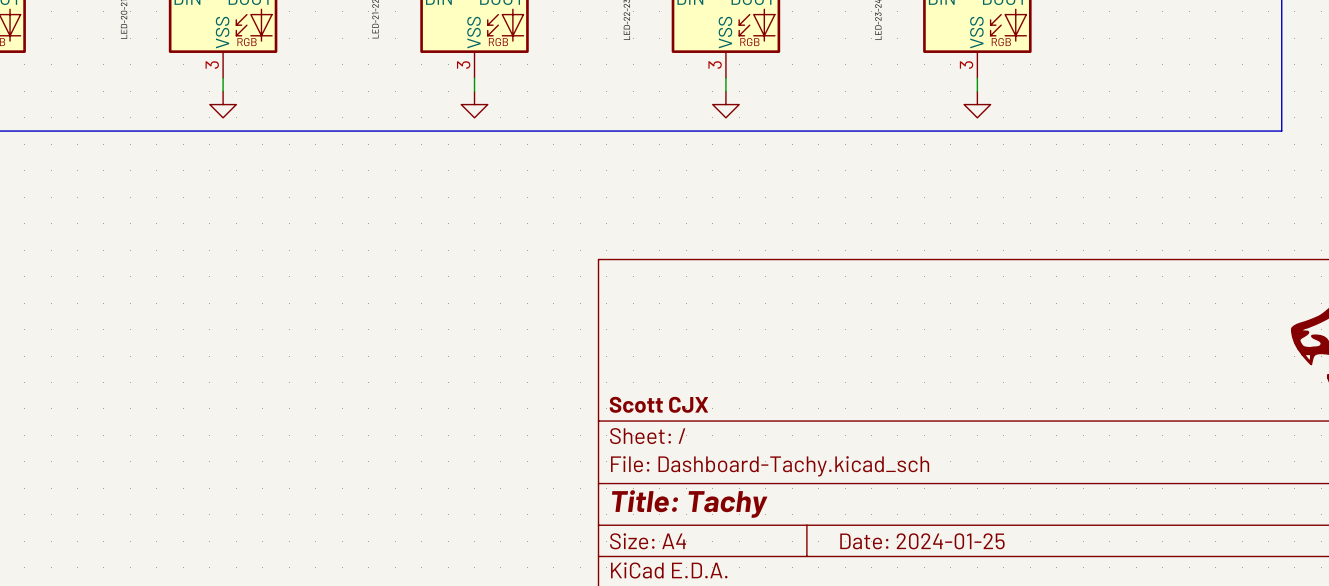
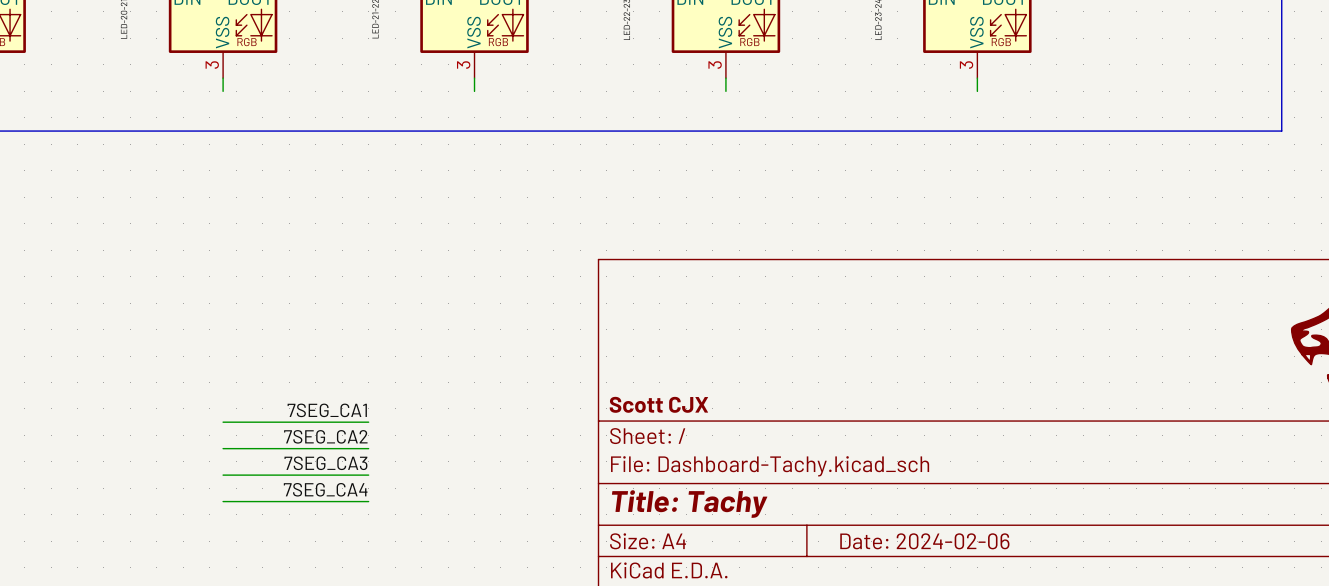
power symbol: (223, 104) -> none
power symbol: (474, 104) -> none
power symbol: (725, 104) -> none
power symbol: (977, 104) -> none
label: none -> 7SEG_CA1 (327, 410)
wire: none -> (223, 422) (368, 422)
label: none -> 7SEG_CA2 (325, 436)
wire: none -> (223, 448) (368, 448)
label: none -> 7SEG_CA3 (325, 463)
wire: none -> (223, 475) (368, 475)
label: none -> 7SEG_CA4 (325, 489)
wire: none -> (223, 501) (368, 501)
title block: Date: 2024-01-25 (922, 541) -> Date: 2024-02-06 (924, 541)

